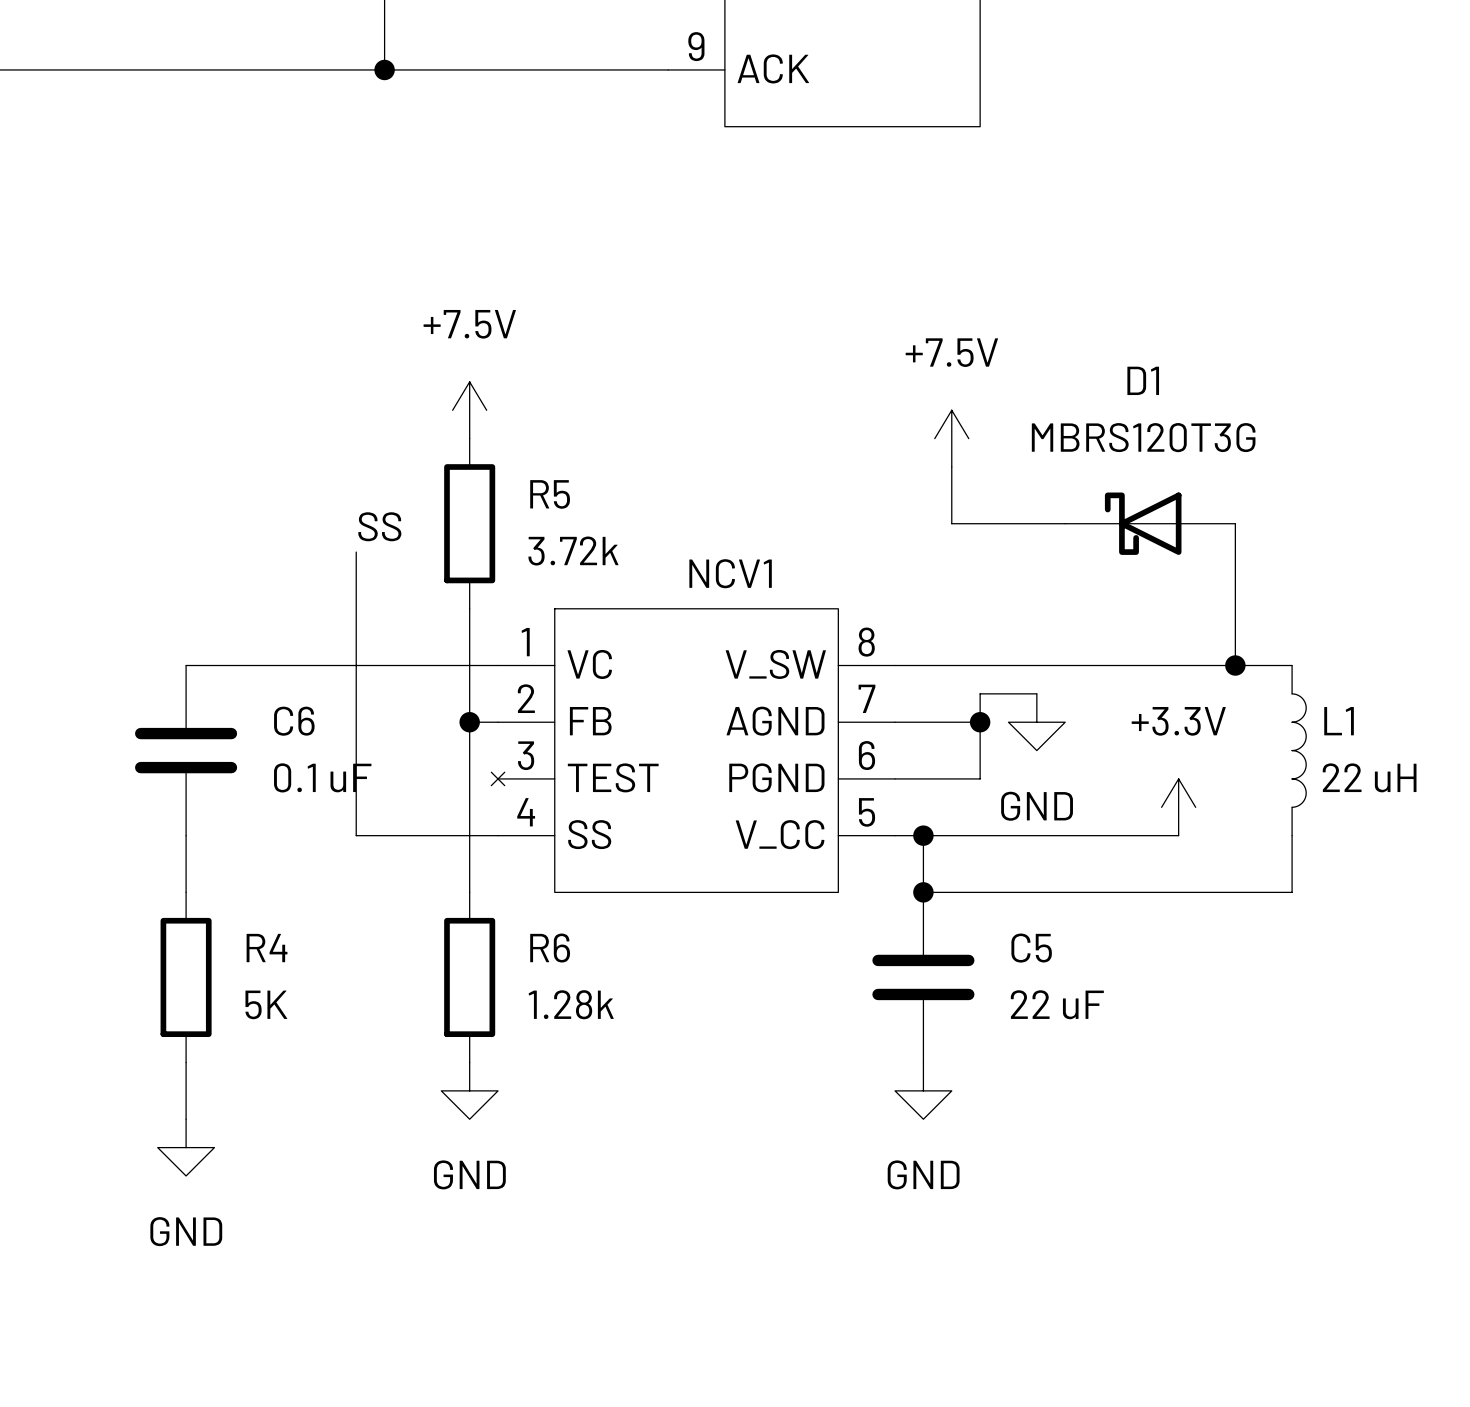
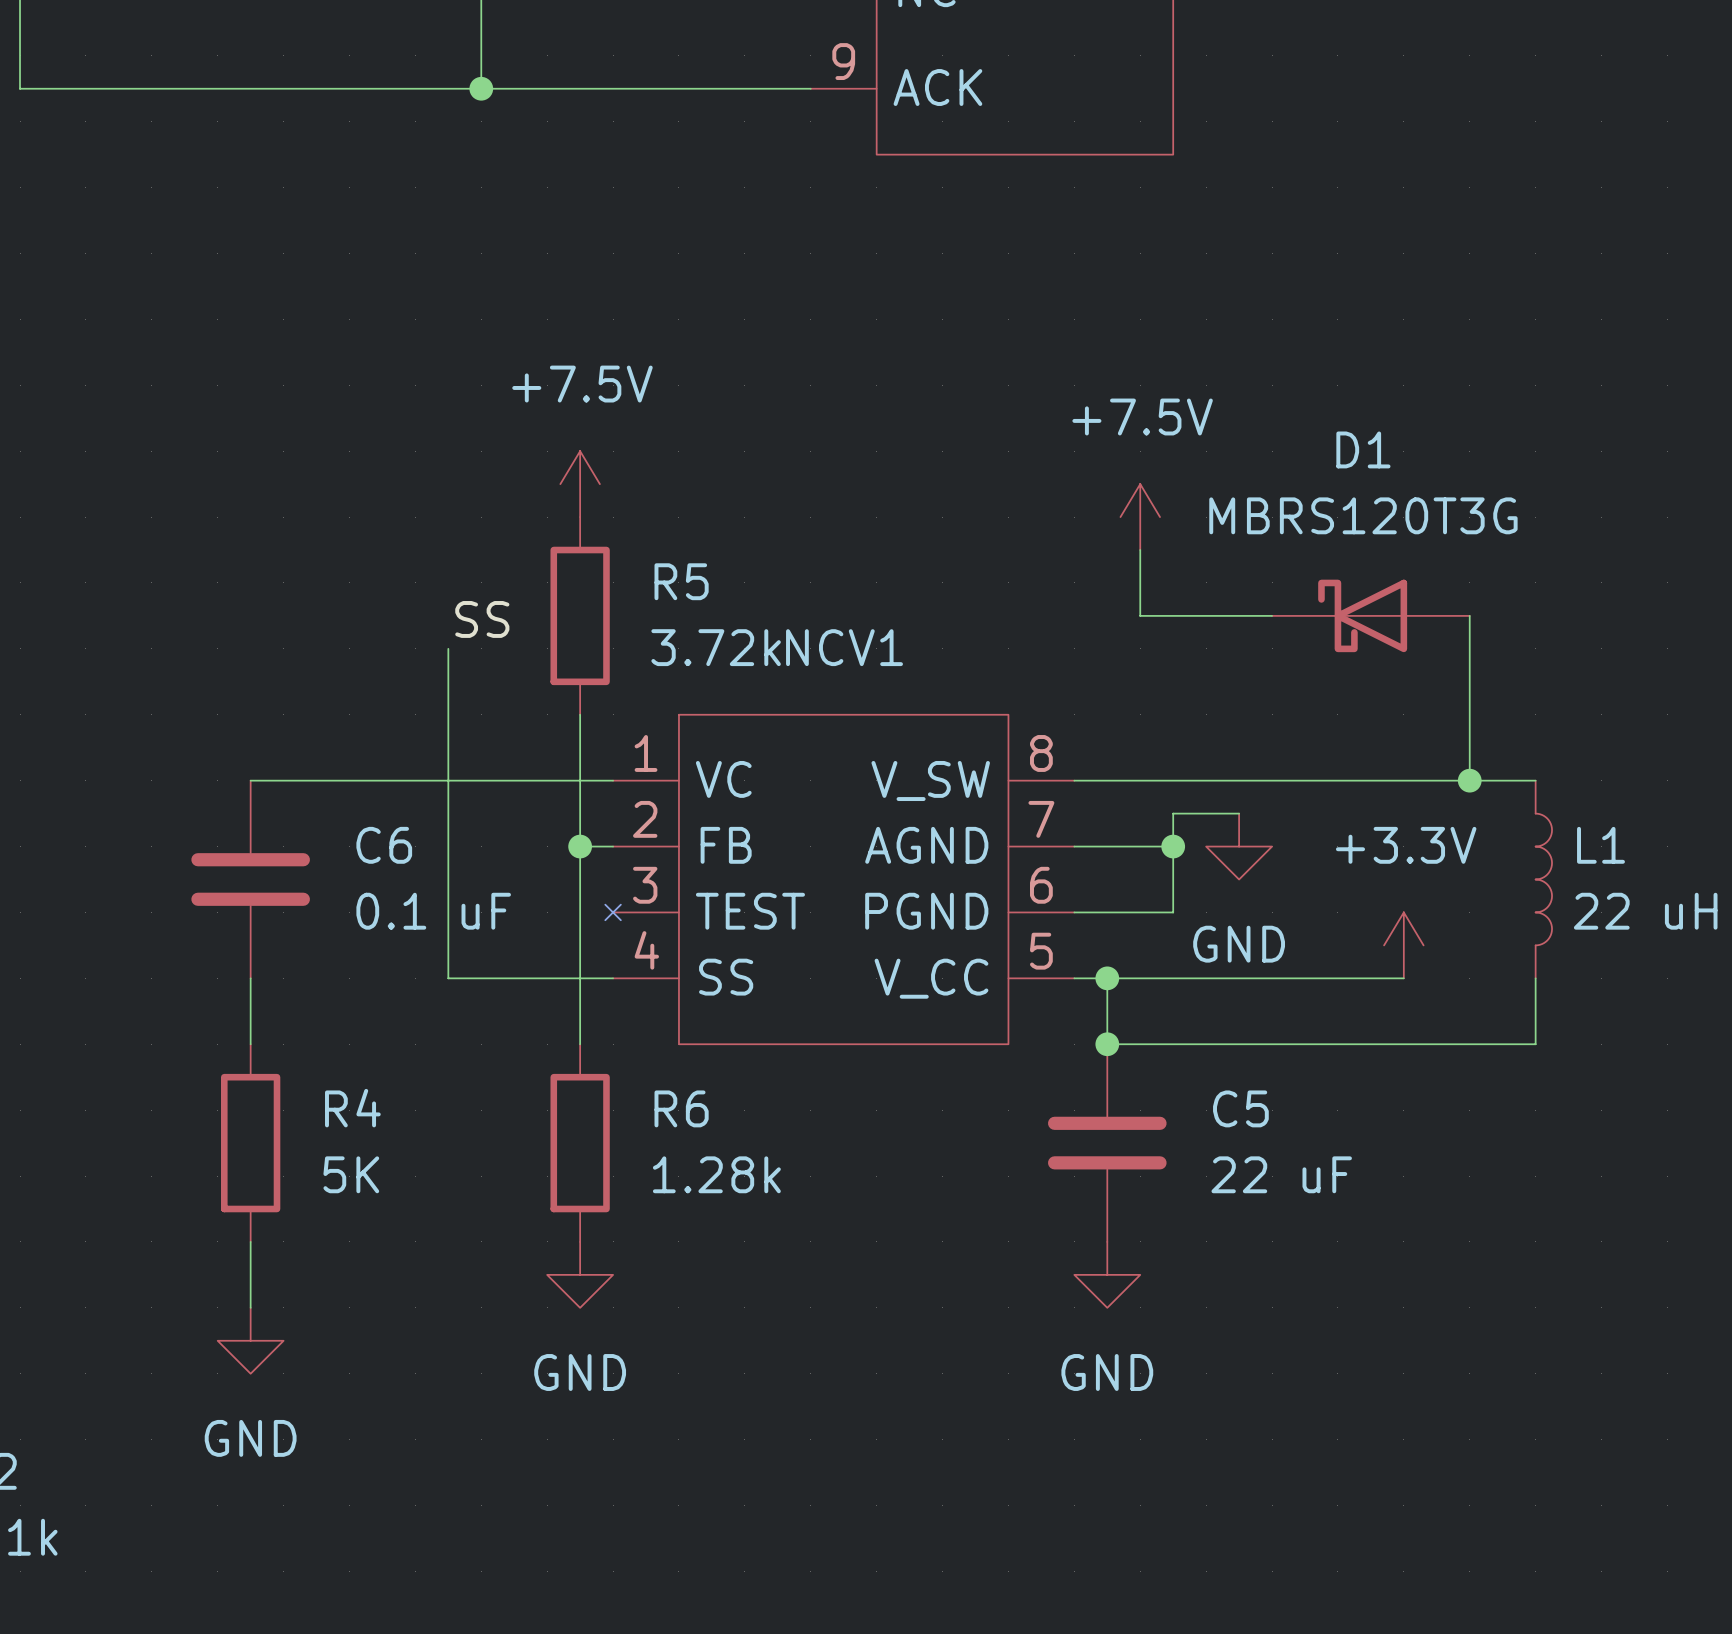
NCV1 name position: NCV1 (730, 573) -> NCV1 (844, 647)

